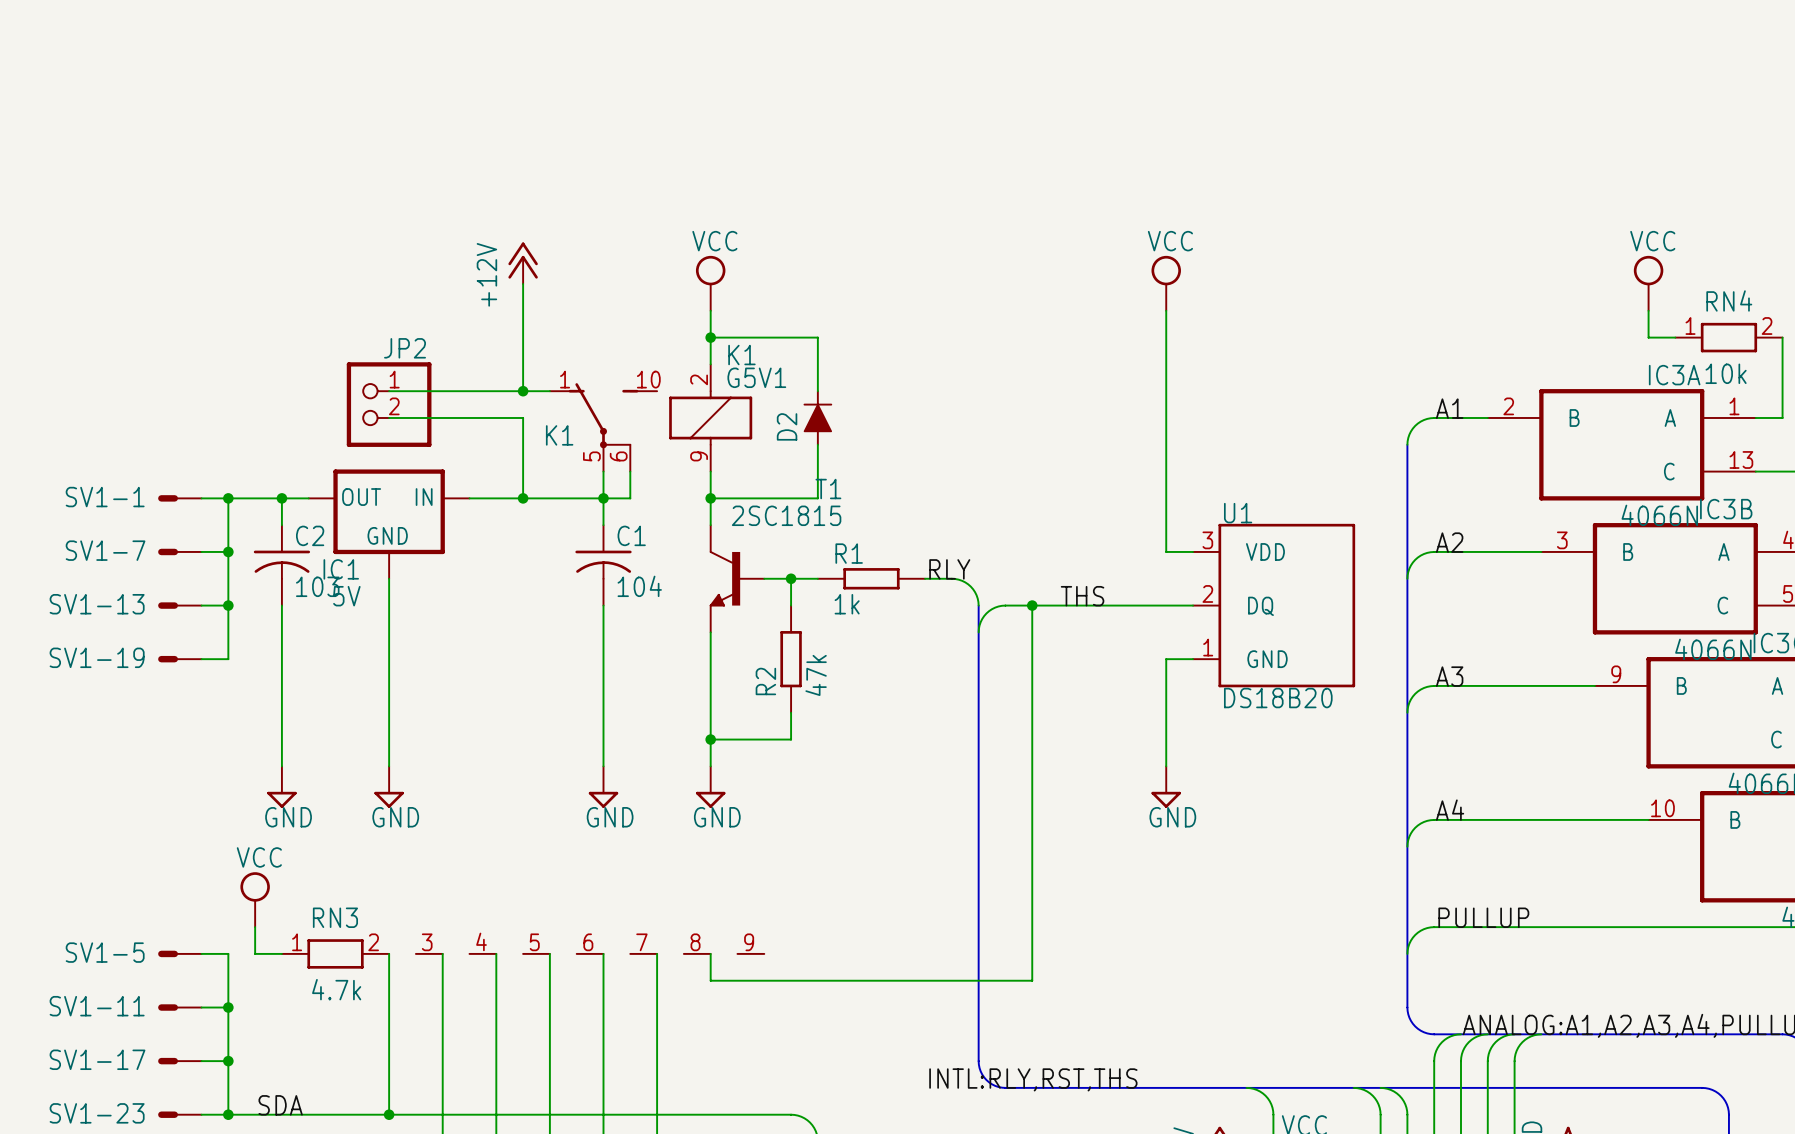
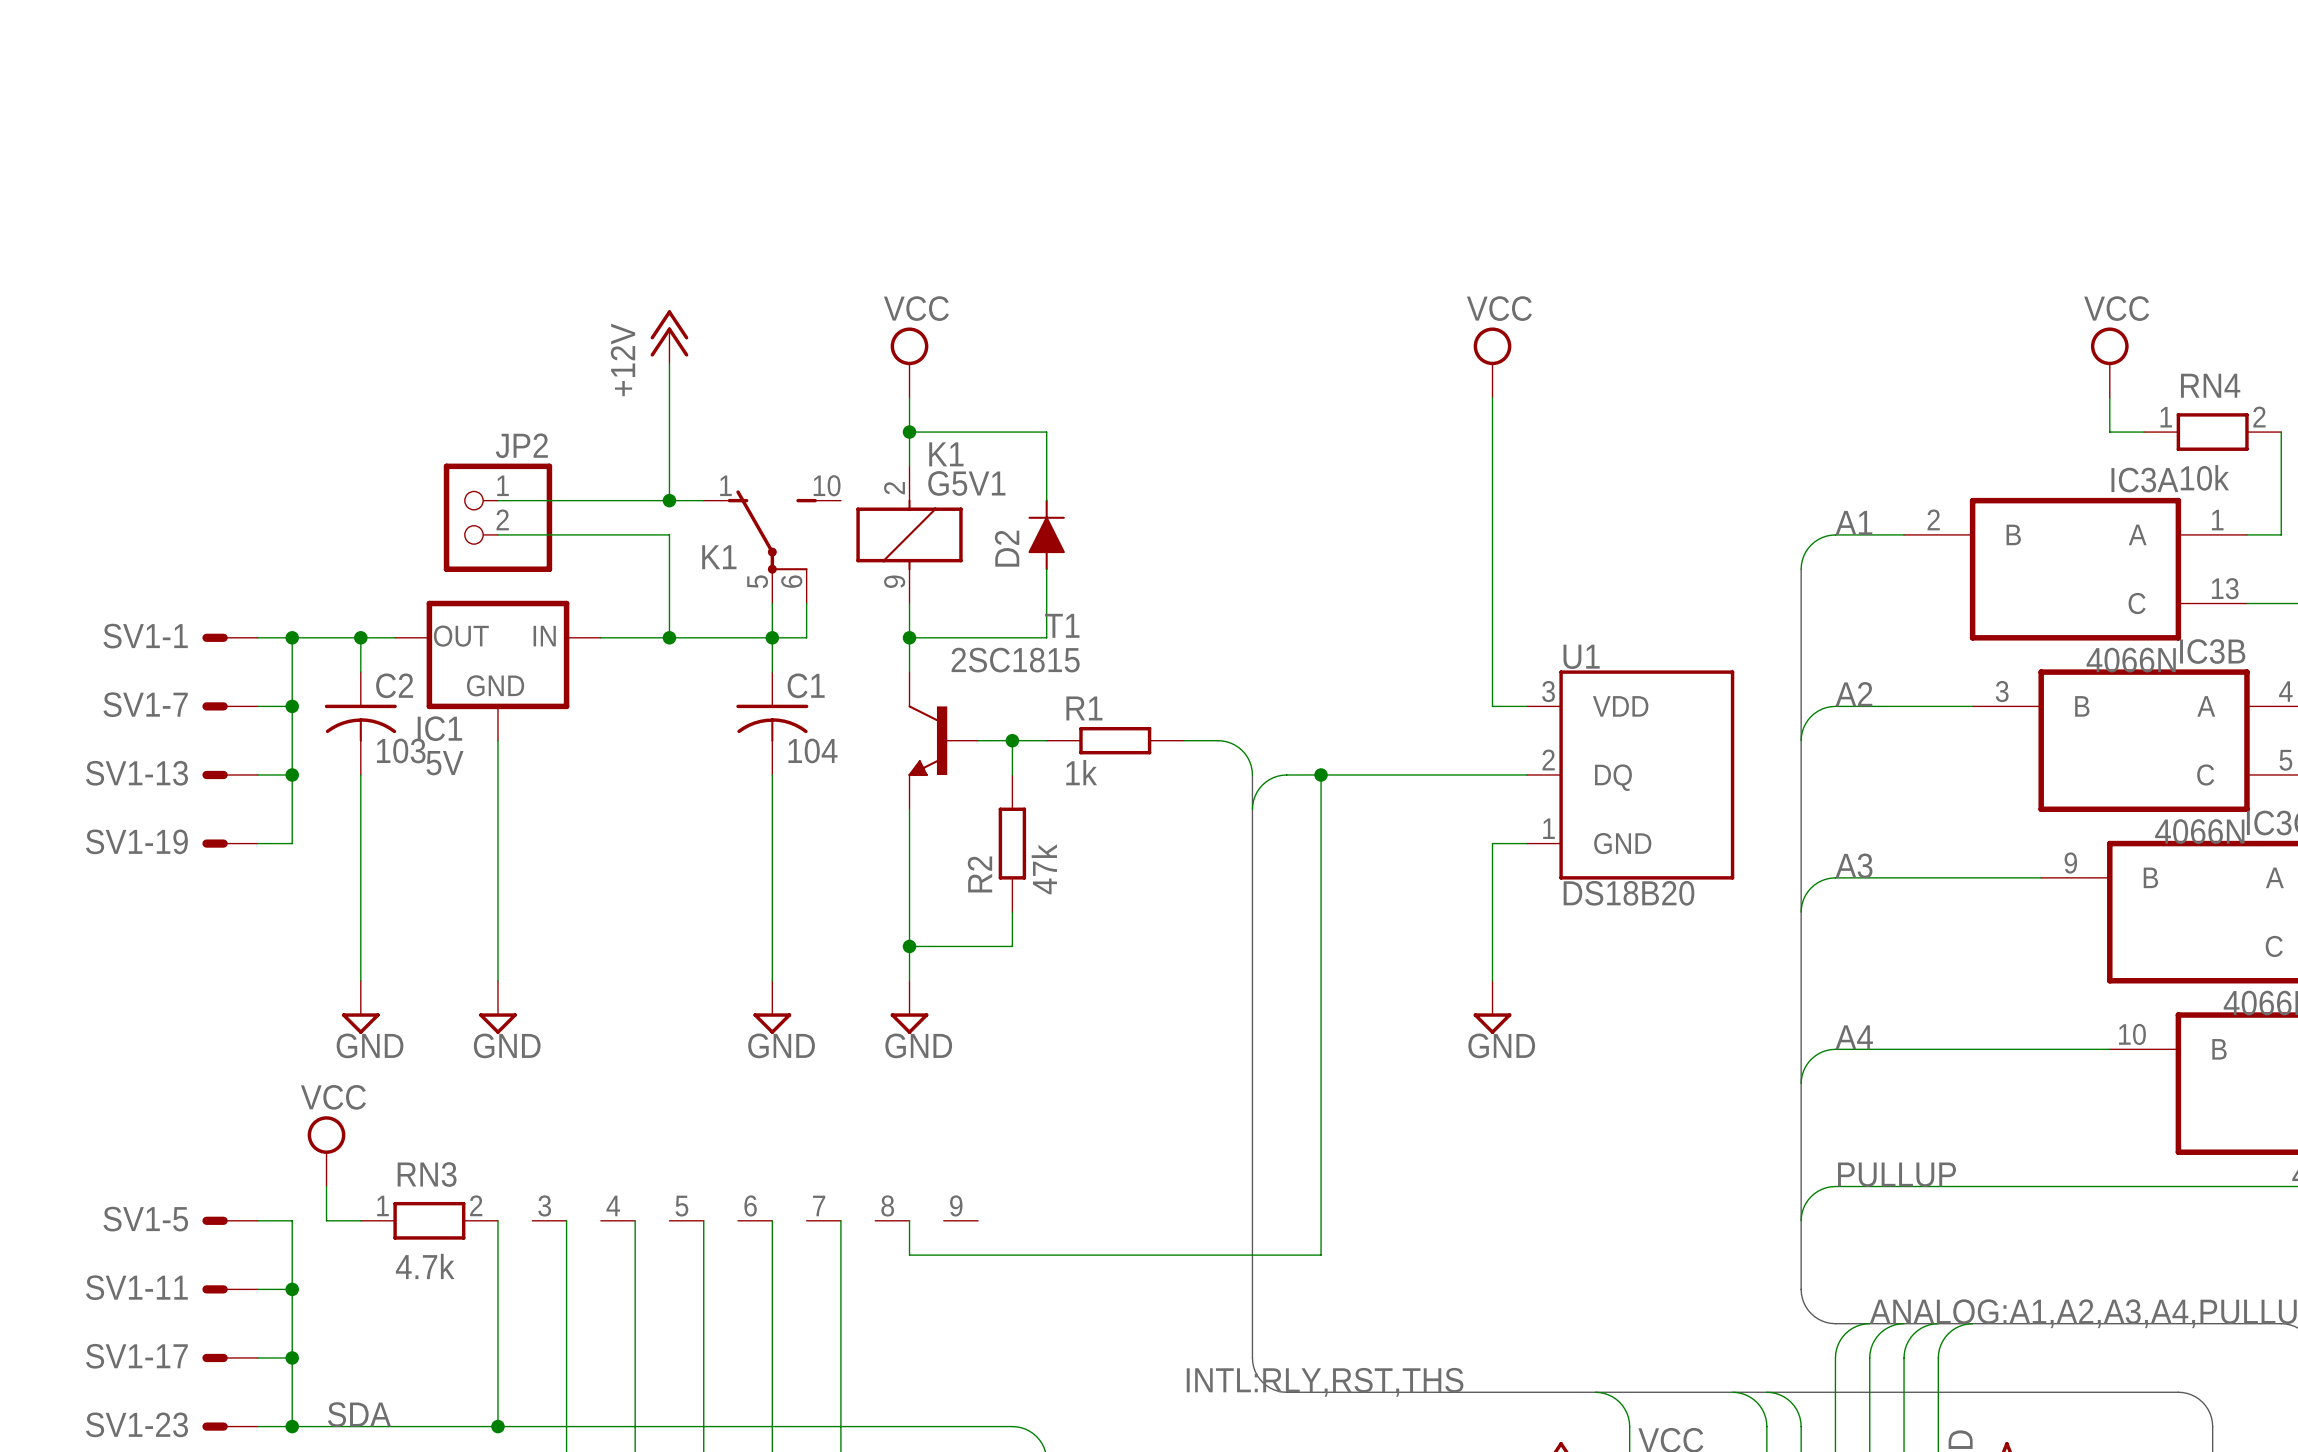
label: RLY (949, 569) -> none
label: THS (1082, 596) -> none

